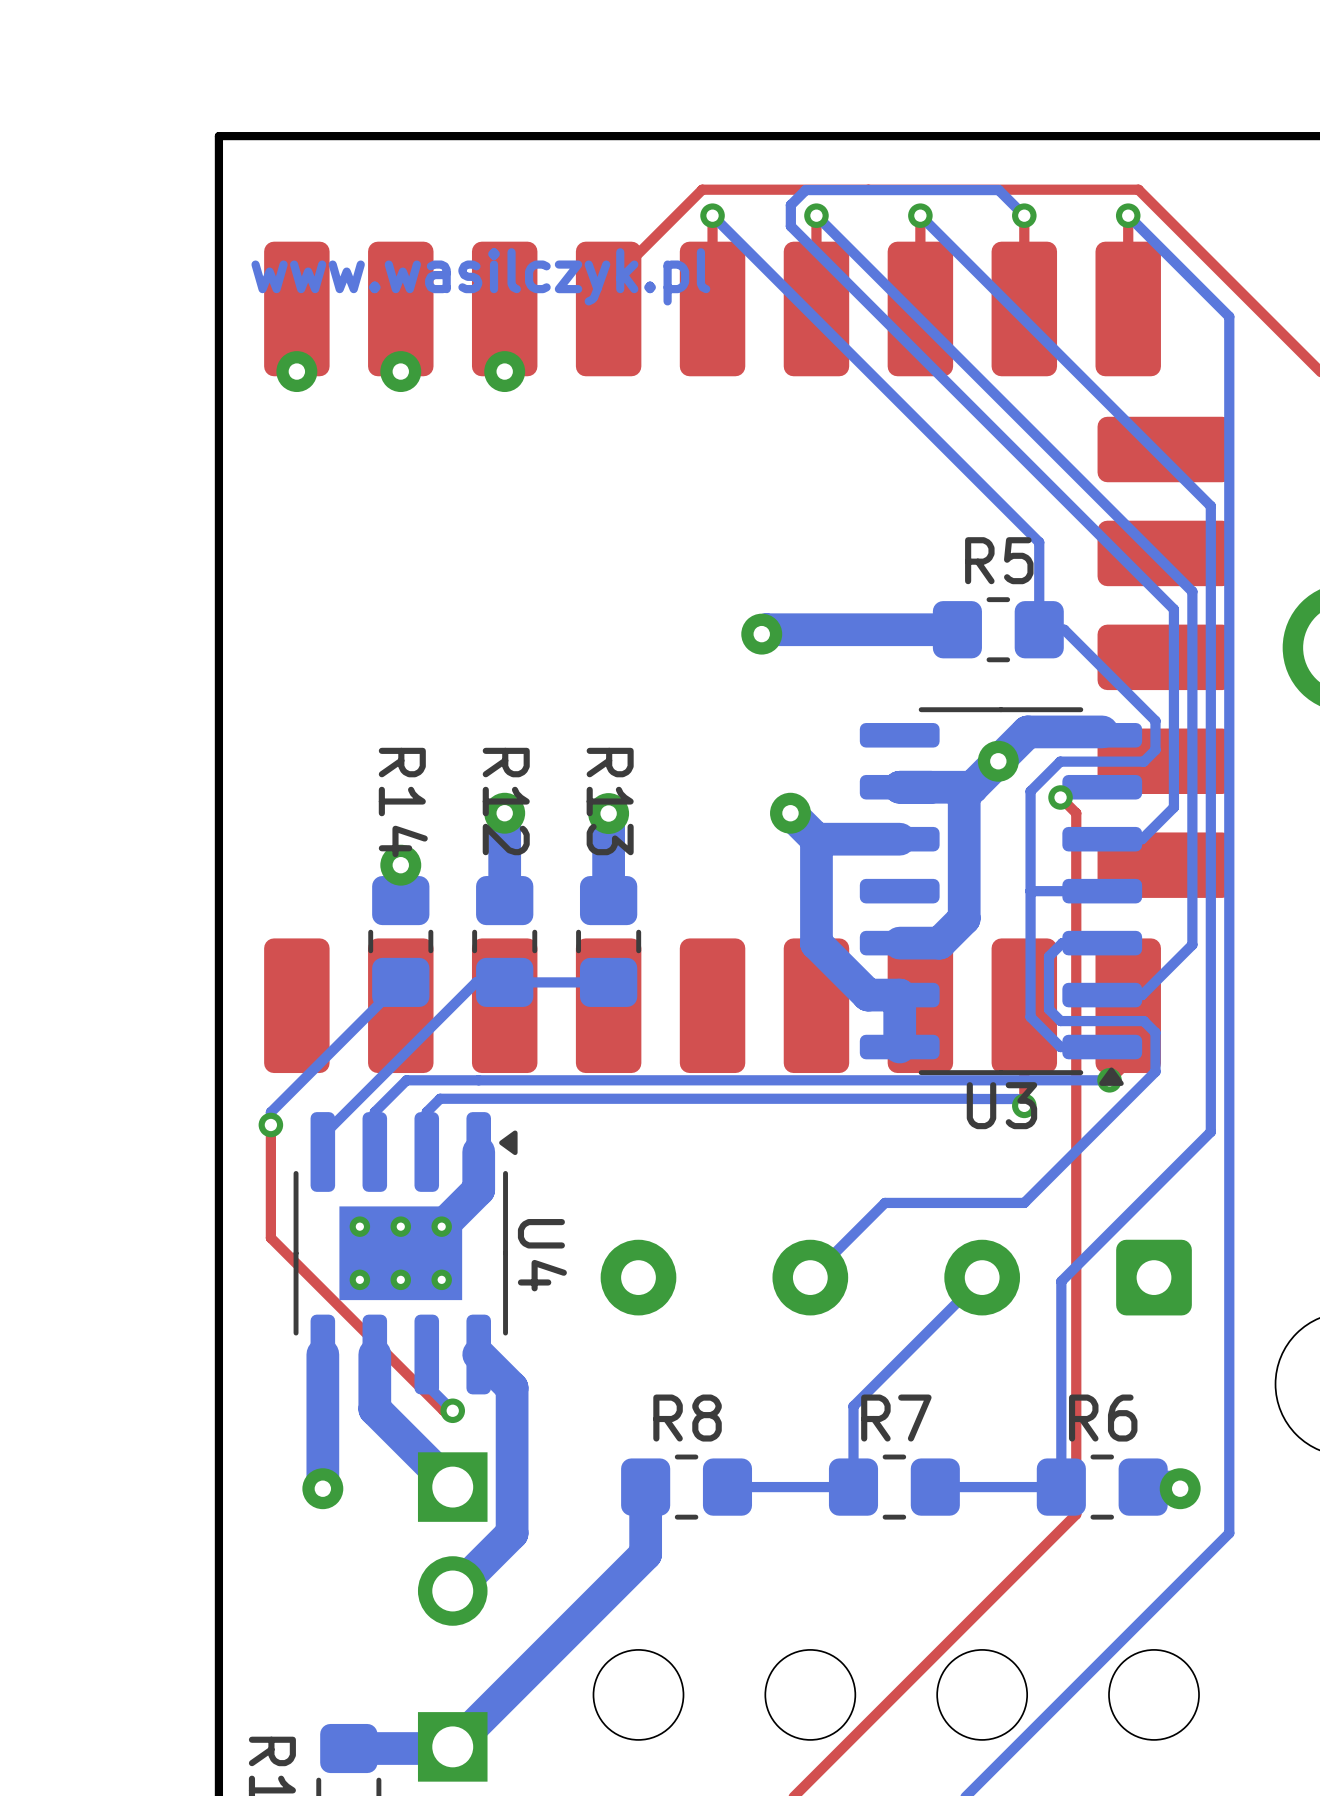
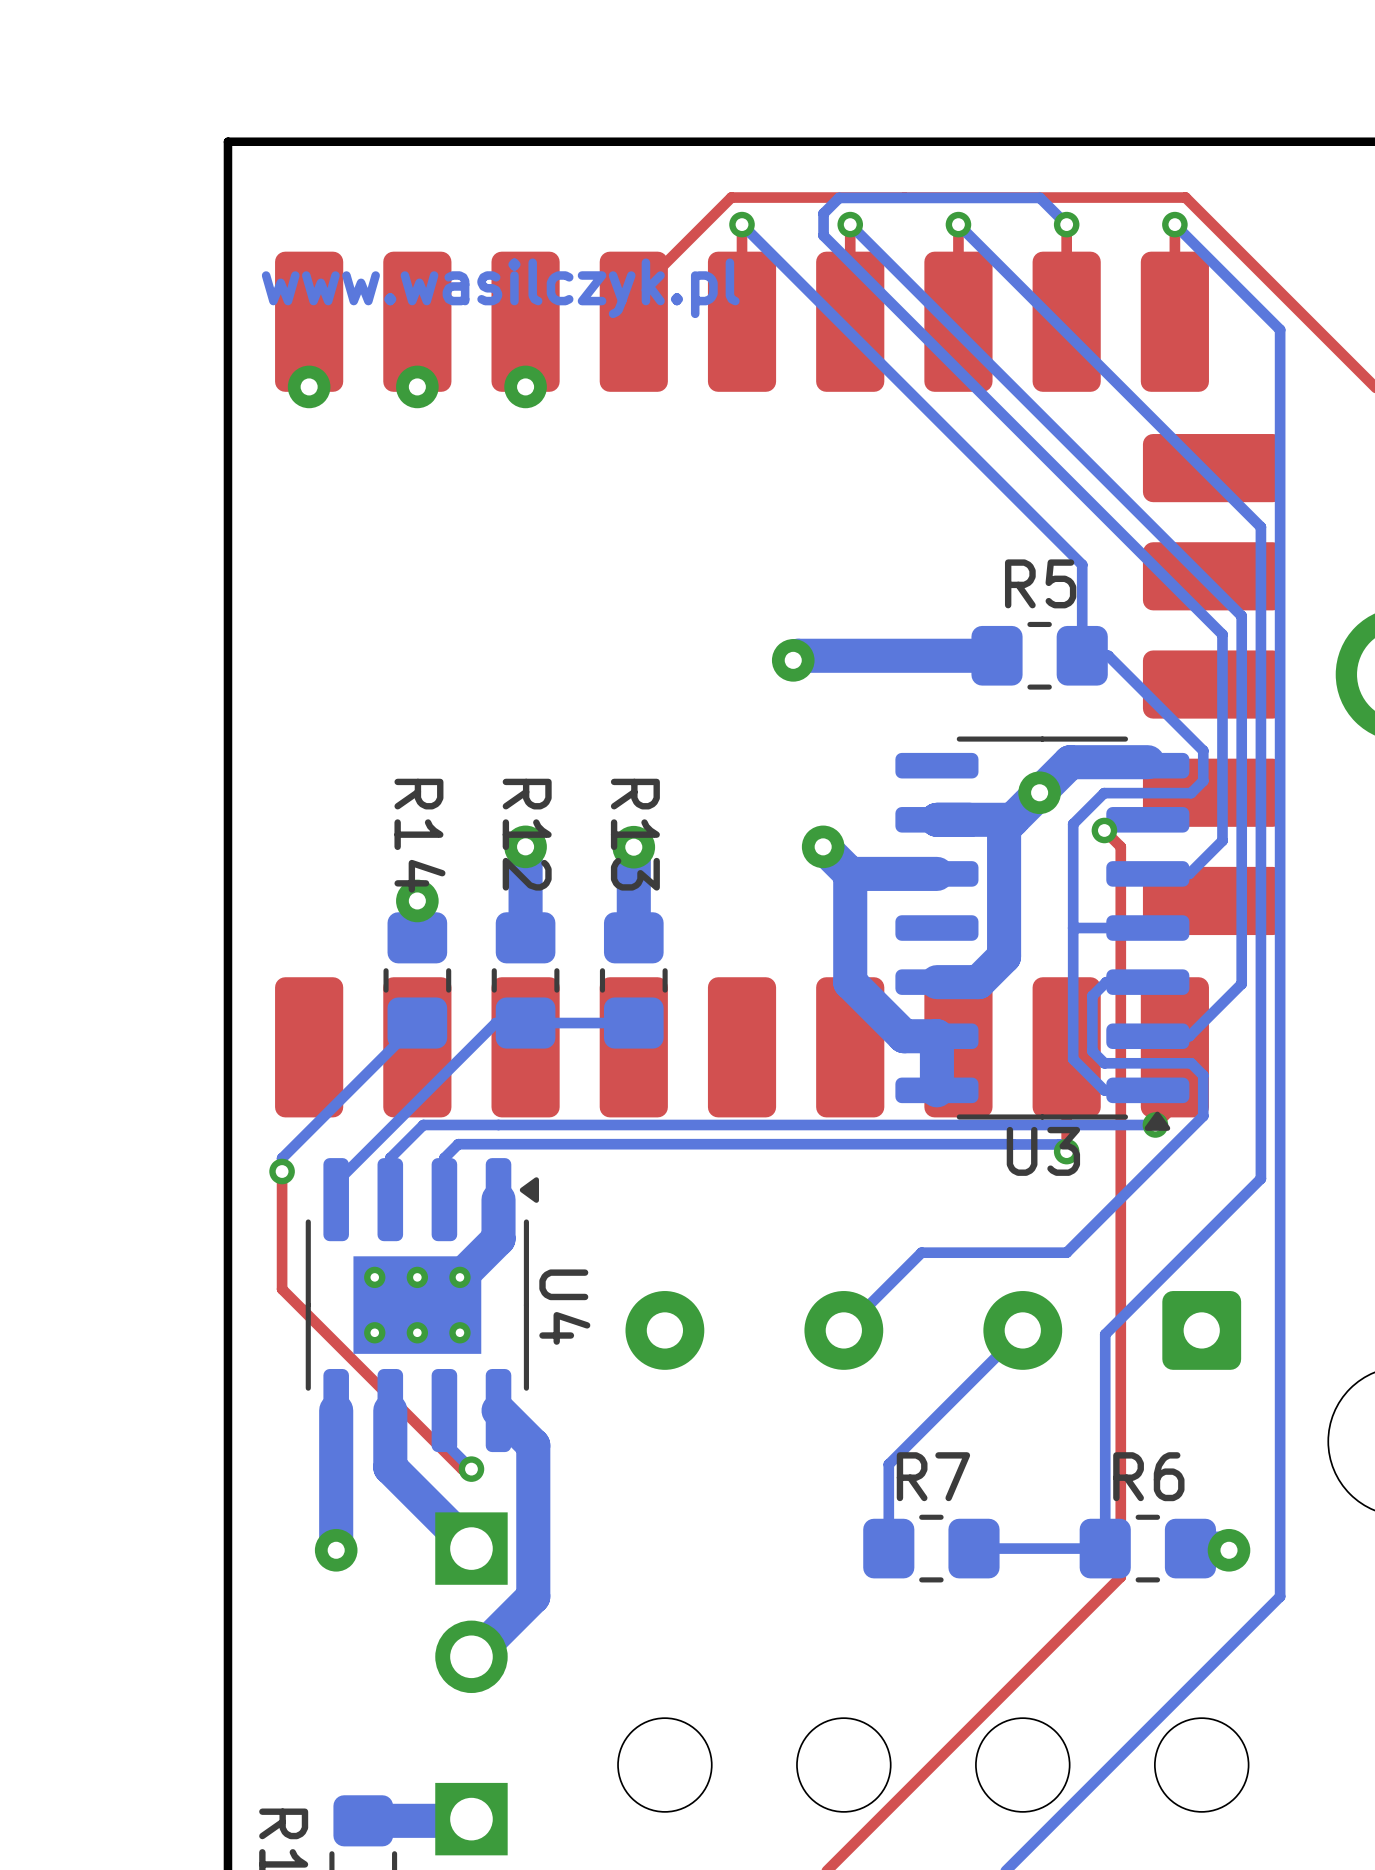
bottom track: (645, 1487) (645, 1553) (452, 1746) -> none
R8: (686, 1487) -> none
bottom track: (853, 1487) (727, 1487) -> none

